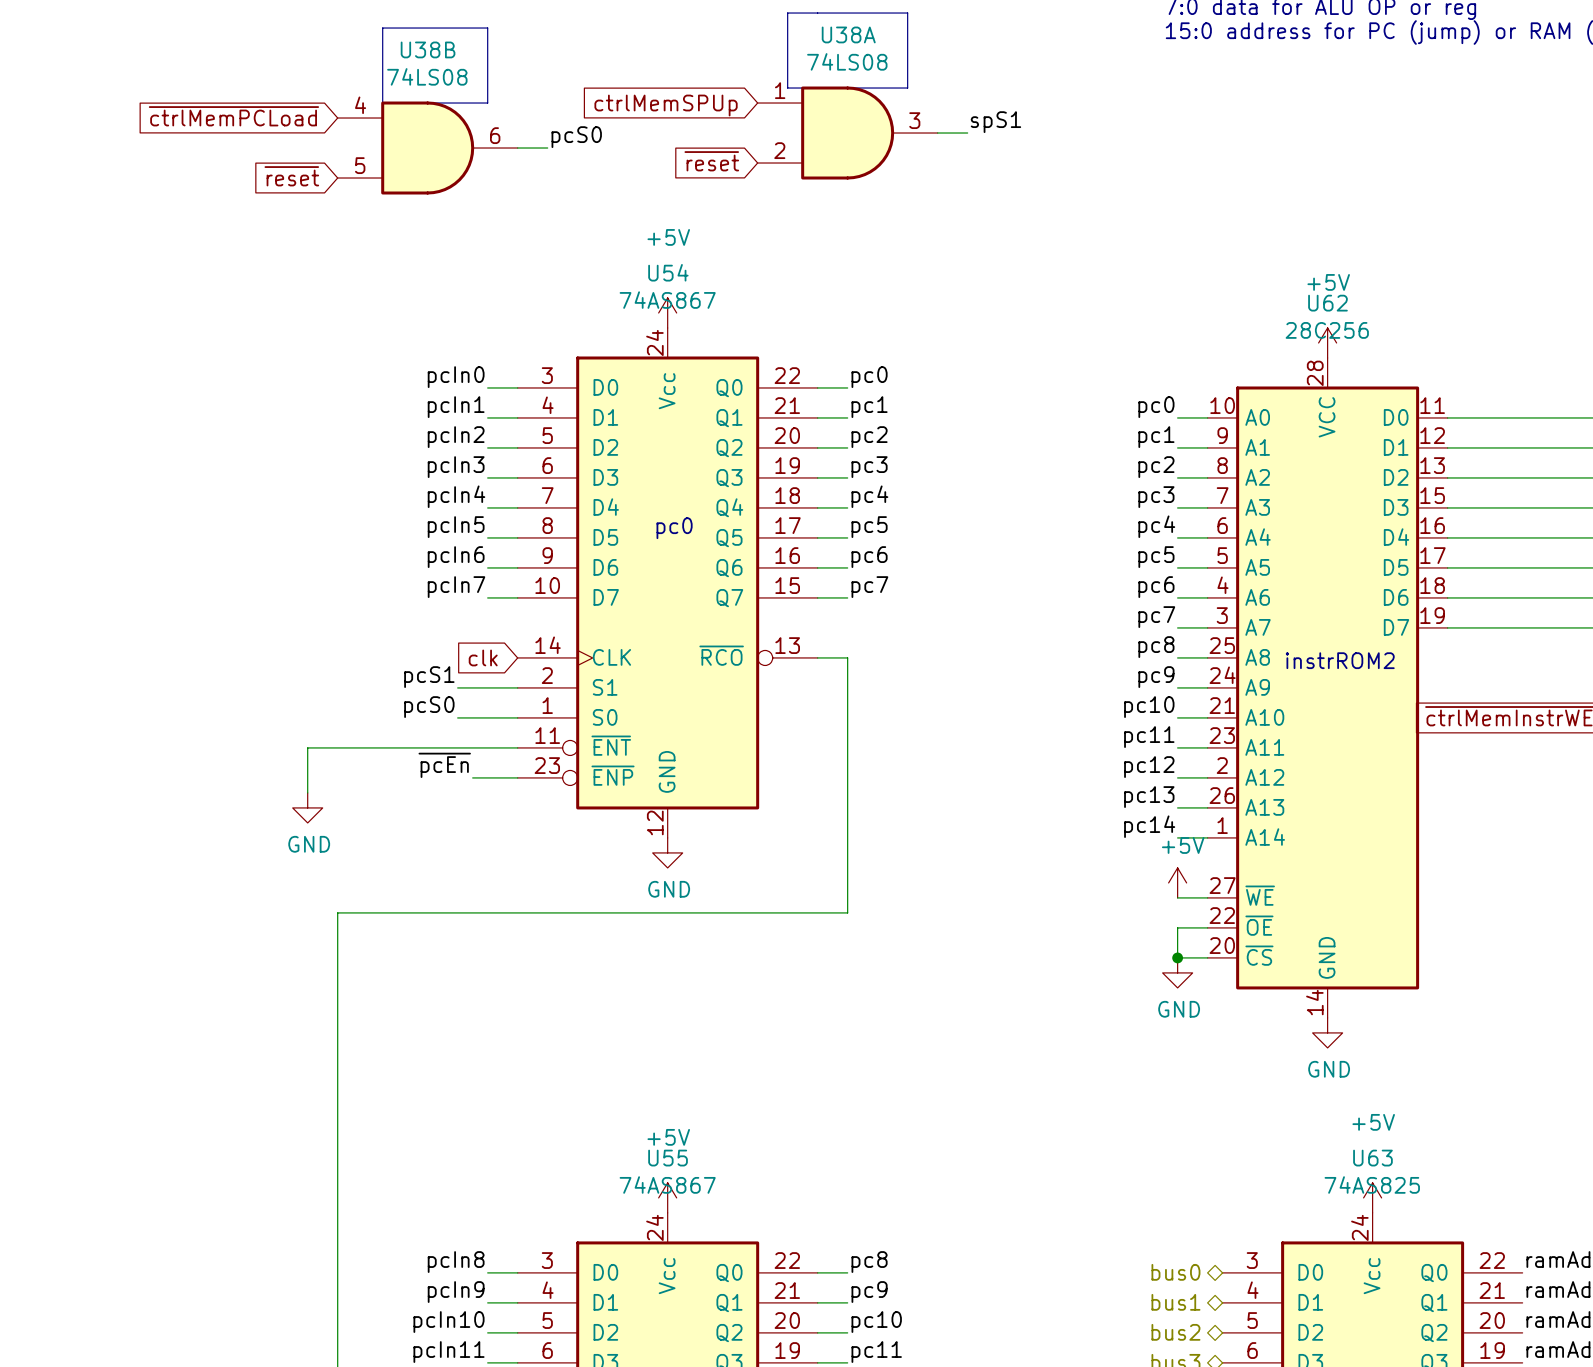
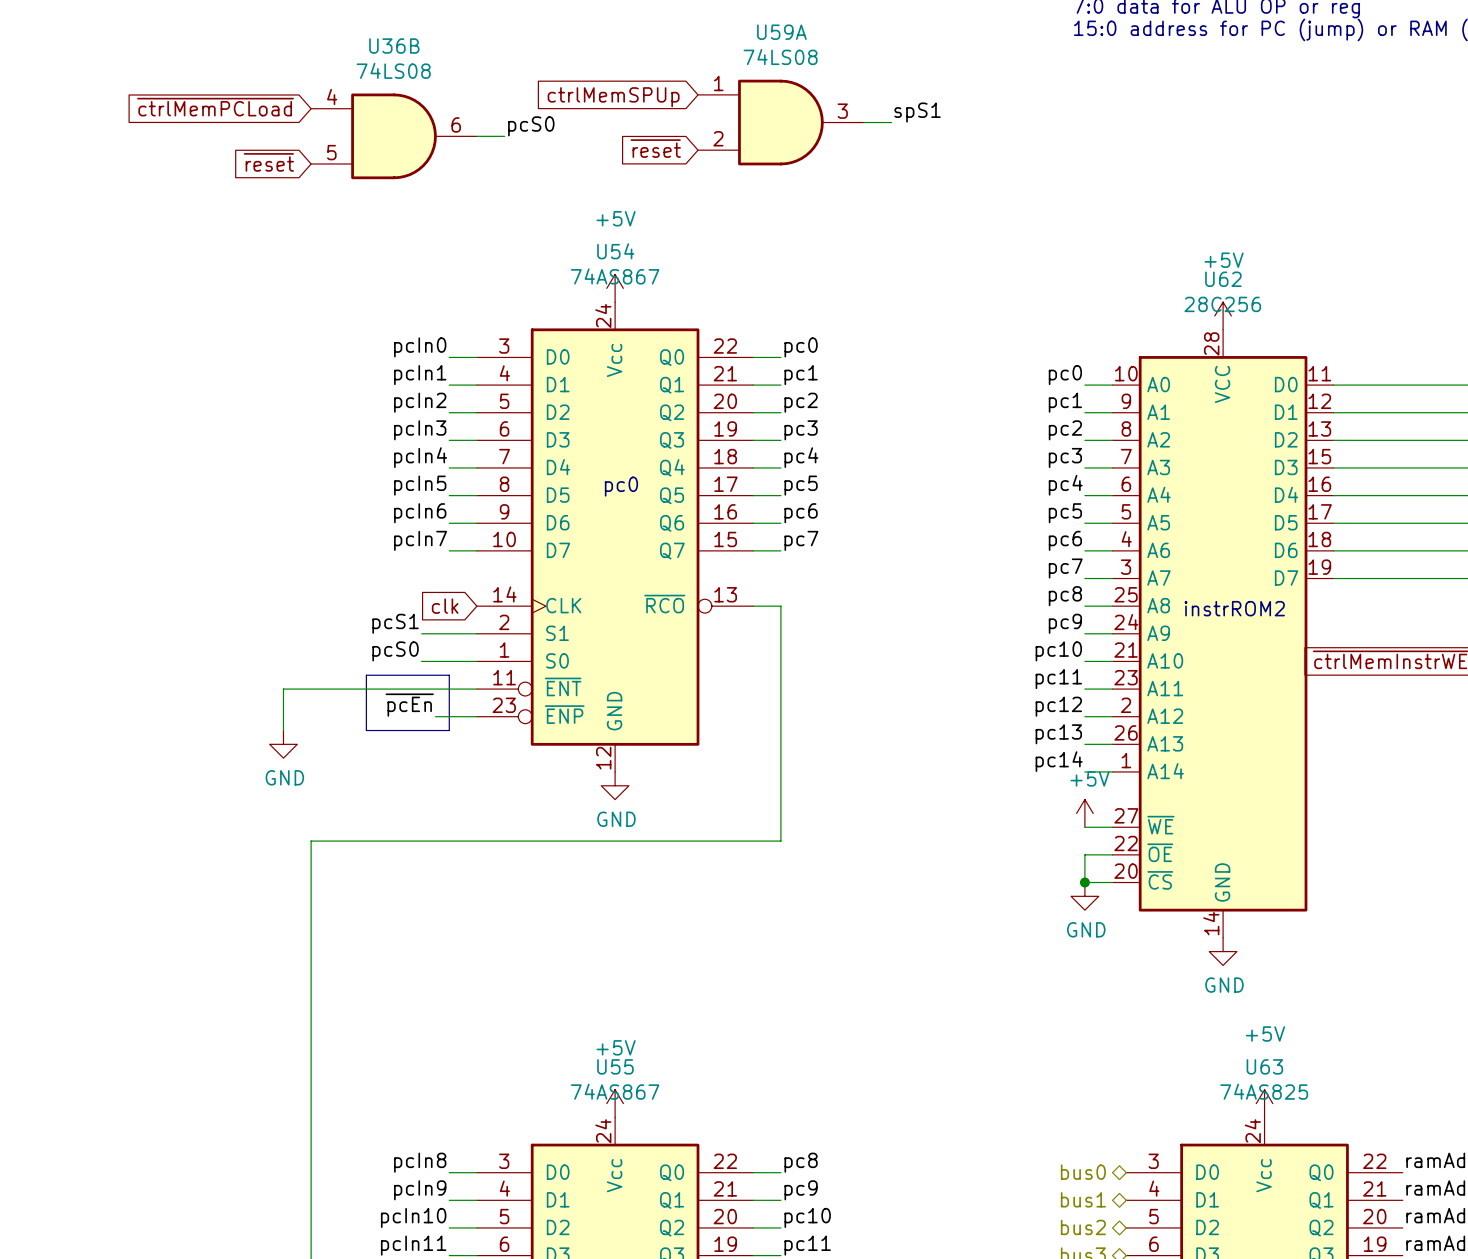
line: (787, 13) (787, 88) (907, 88) (907, 13) (787, 13) -> none
line: (382, 28) (382, 103) (487, 103) (487, 28) (382, 28) -> none
U38A name: U38A (848, 34) -> U59A (781, 32)
U38B name: U38B (428, 49) -> U36B (394, 46)
line: none -> (366, 675) (366, 730) (449, 730) (449, 675) (366, 675)

